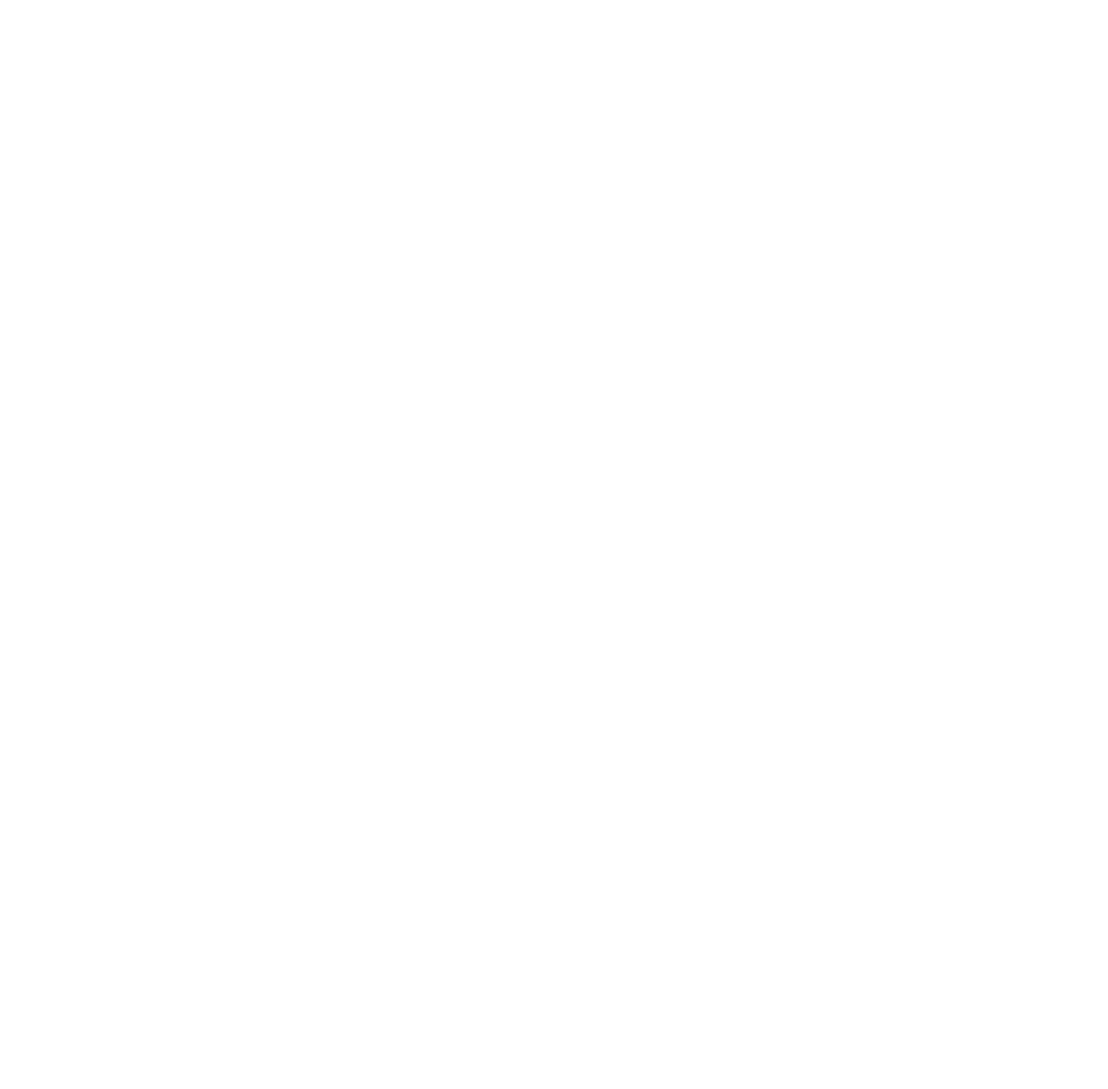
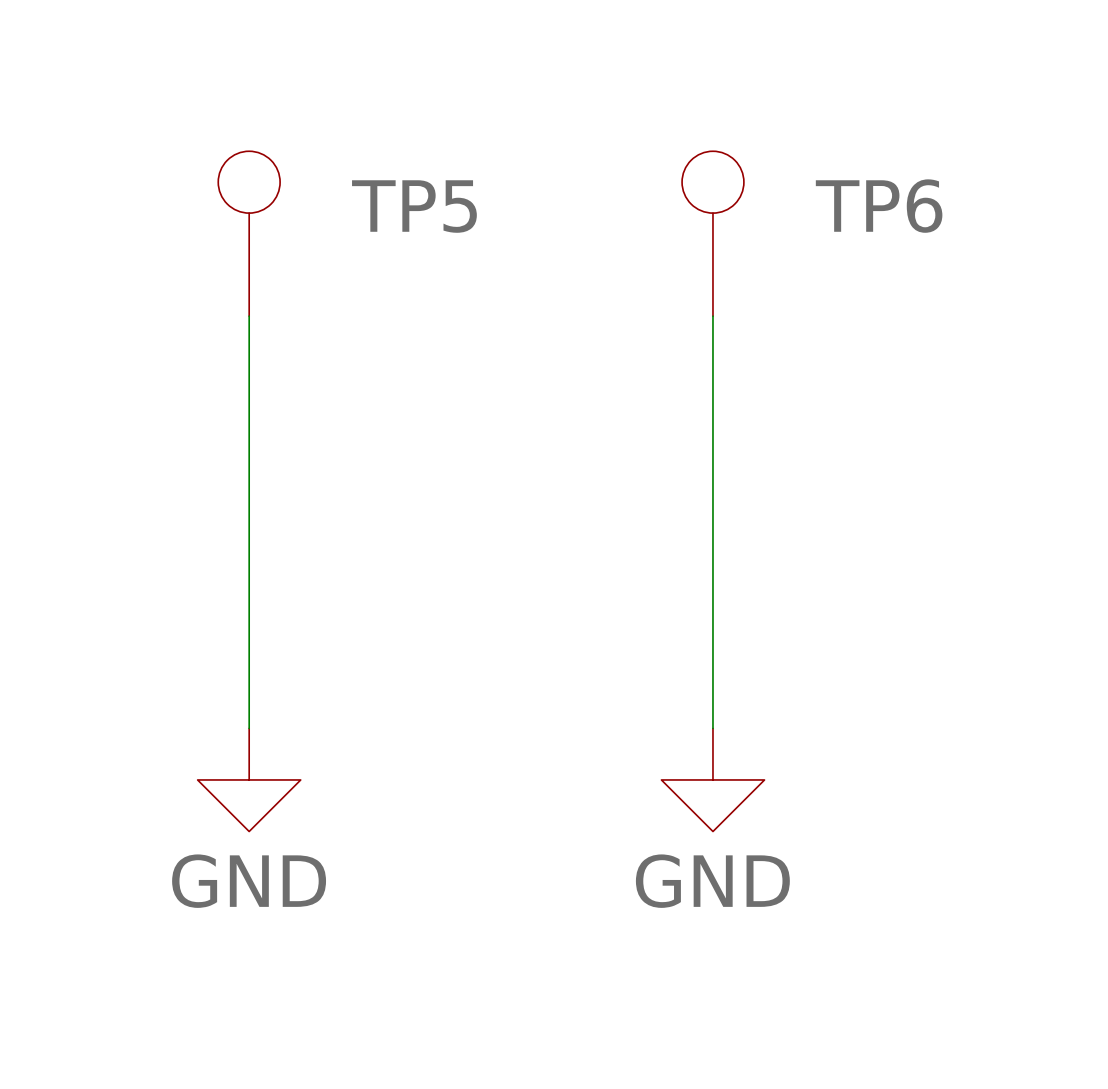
TP5: none -> (249, 233)
TP6: none -> (712, 233)
wire: none -> (249, 316) (249, 728)
wire: none -> (712, 316) (712, 728)
power symbol: none -> GND (249, 779)
power symbol: none -> GND (712, 779)

